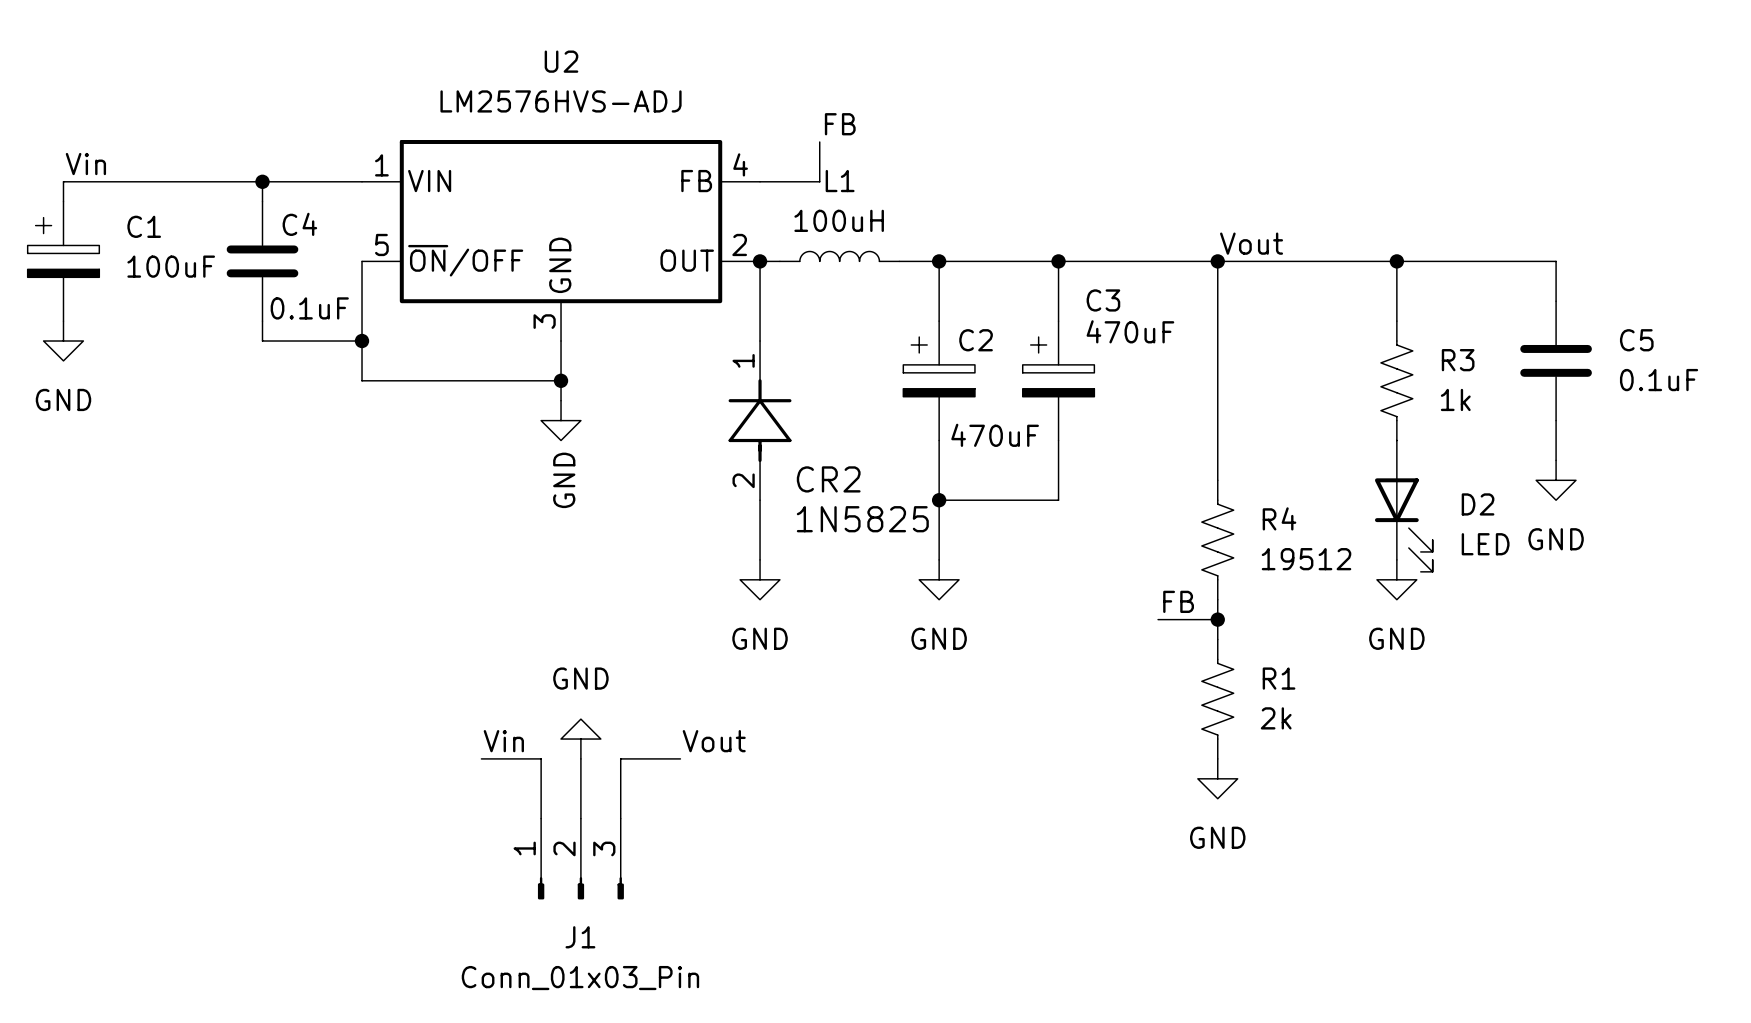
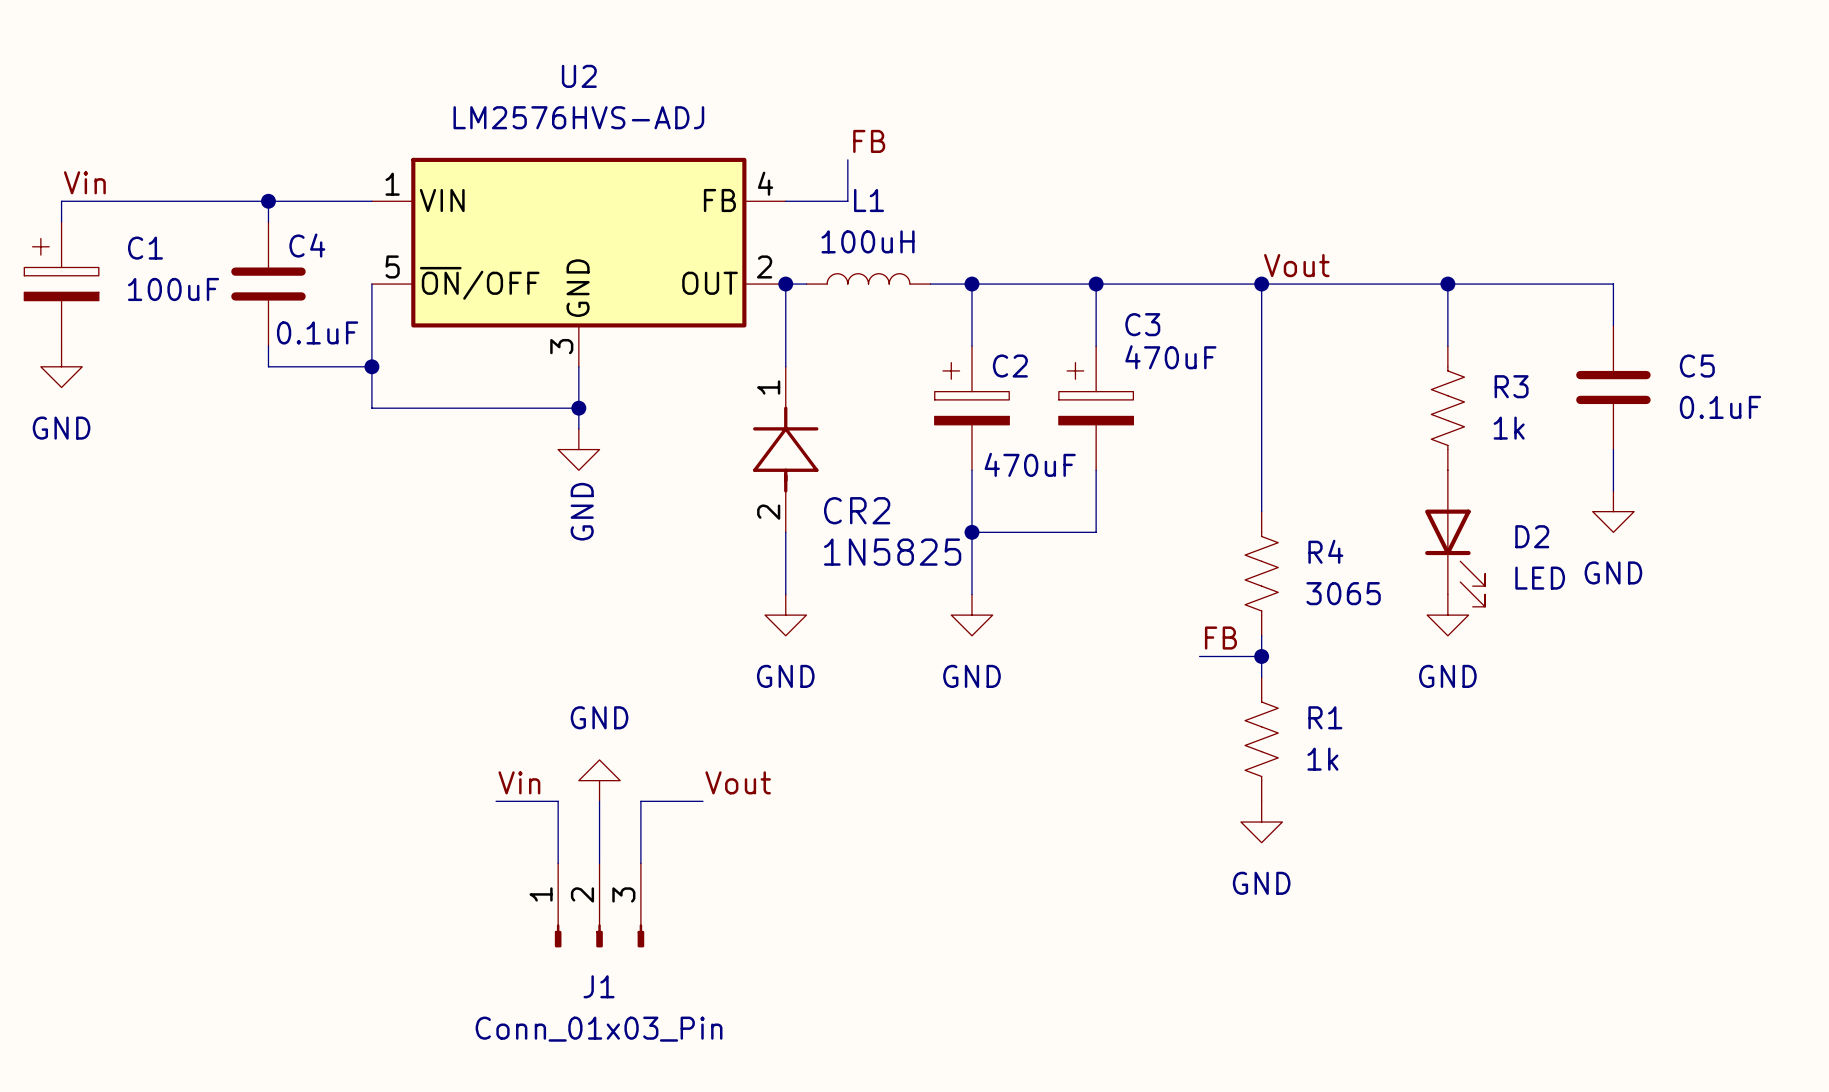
R4 value: 19512 (1306, 559) -> 3065 (1343, 593)
R1 value: 2k (1276, 718) -> 1k (1322, 759)

